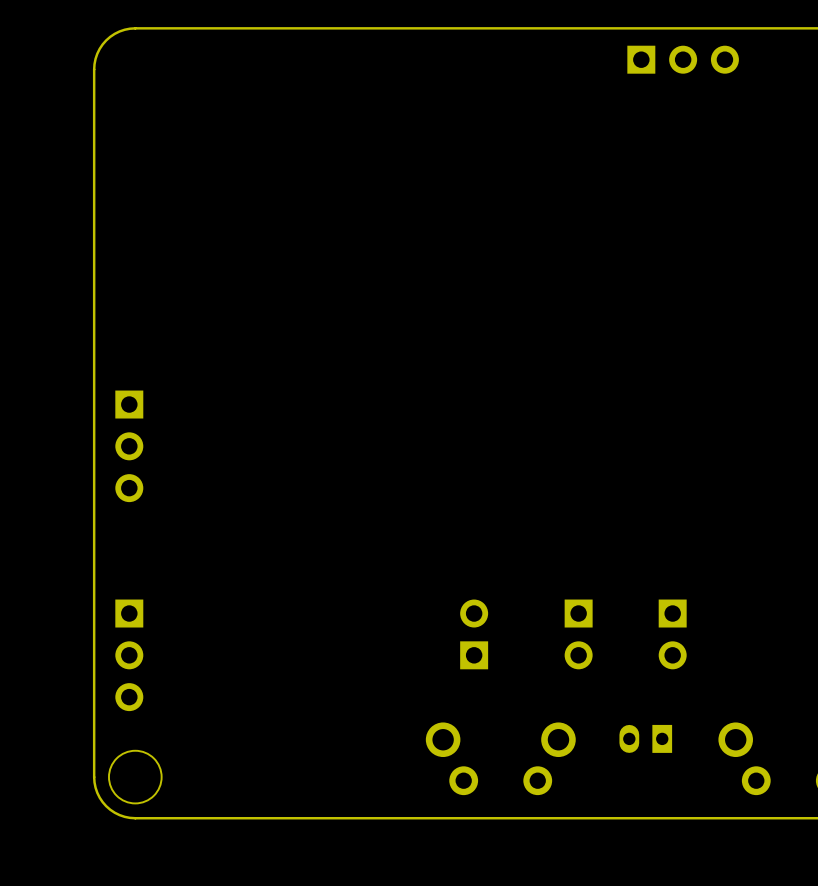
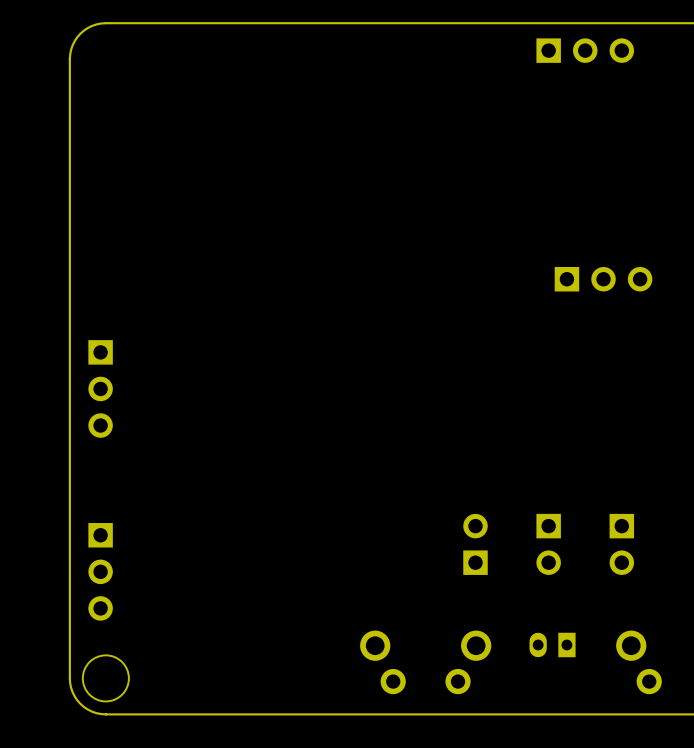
part: none -> (603, 279)
part: none -> (548, 544)
part: none -> (621, 544)
part: (474, 634) -> none
part rotation: 0° (578, 634) -> 180° (475, 544)
part: (672, 634) -> none

